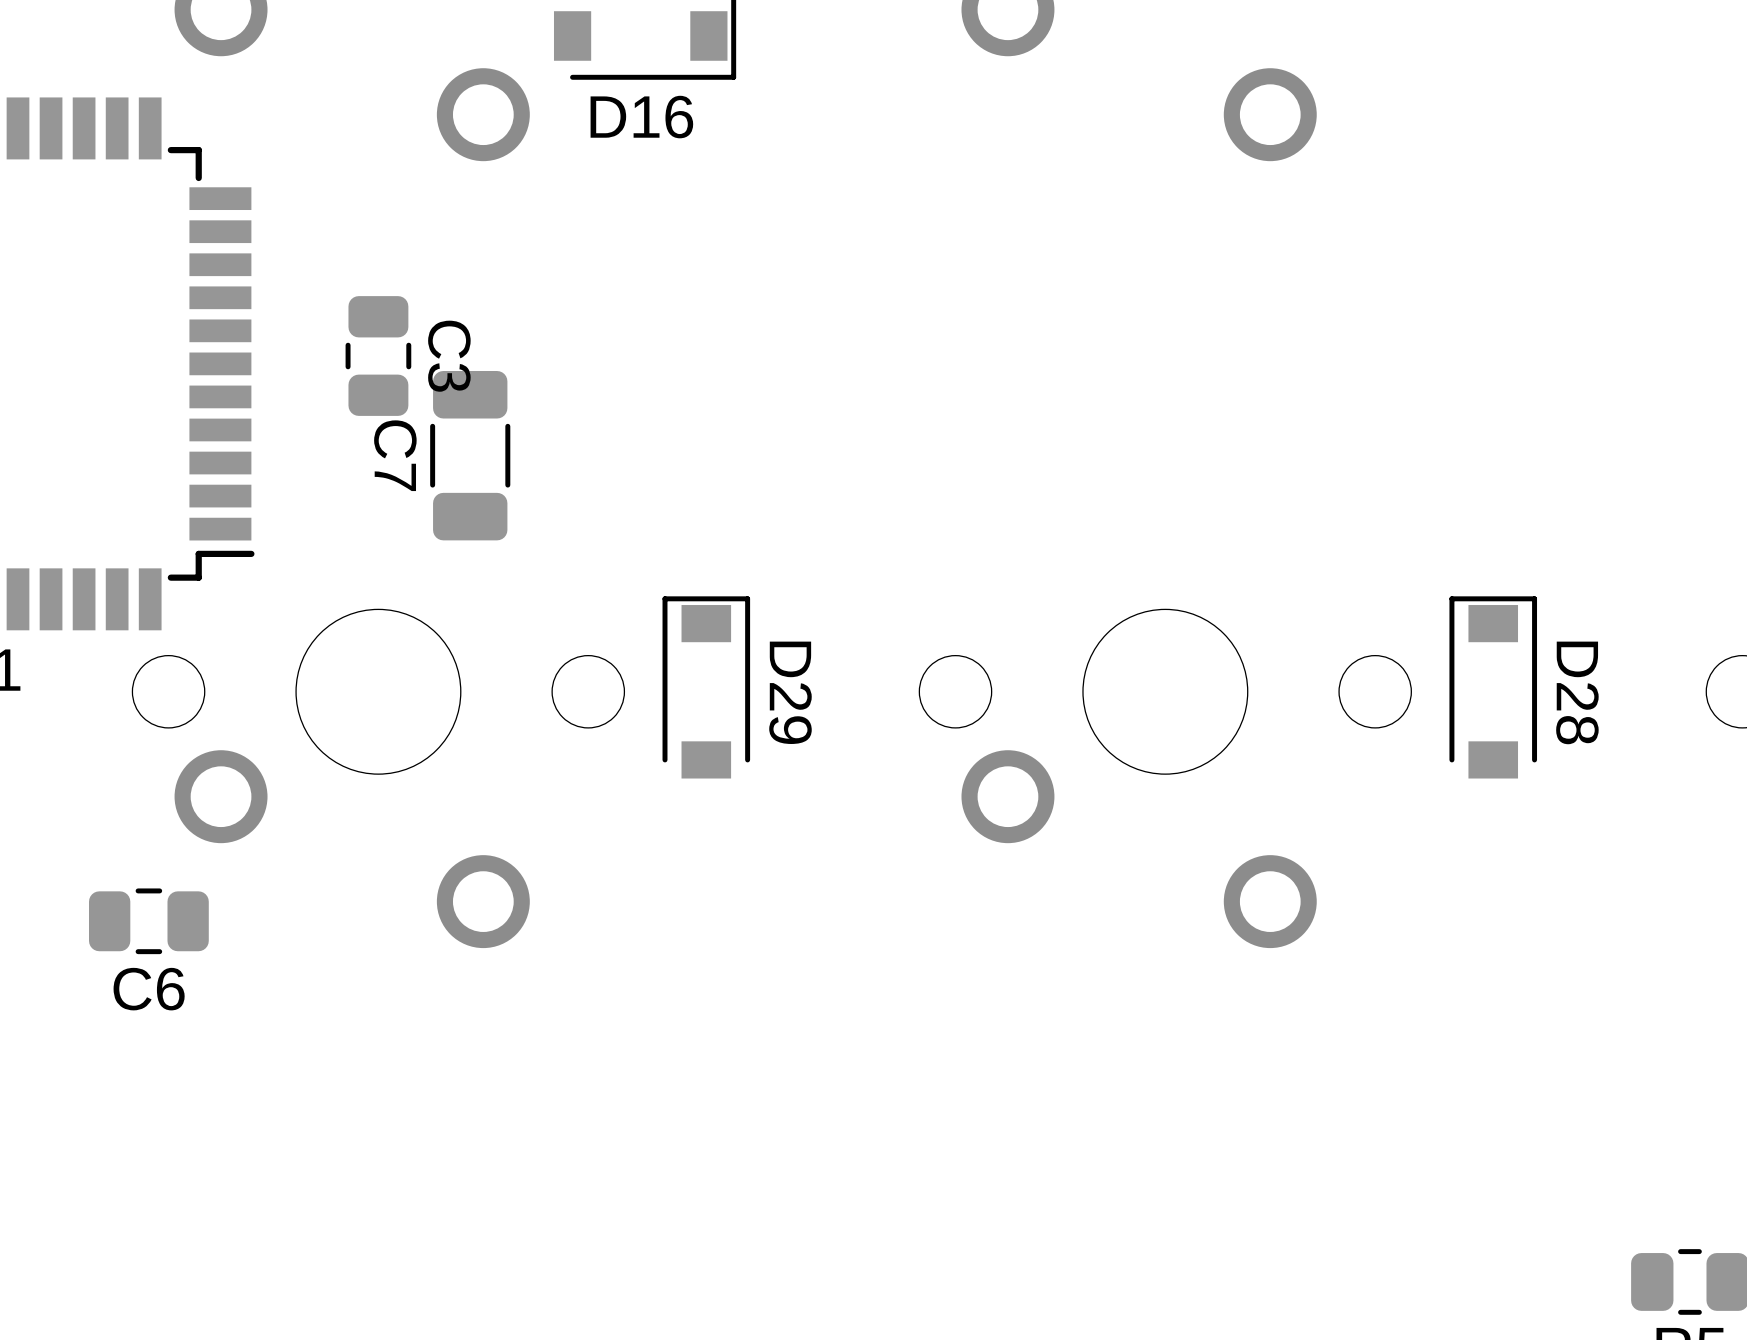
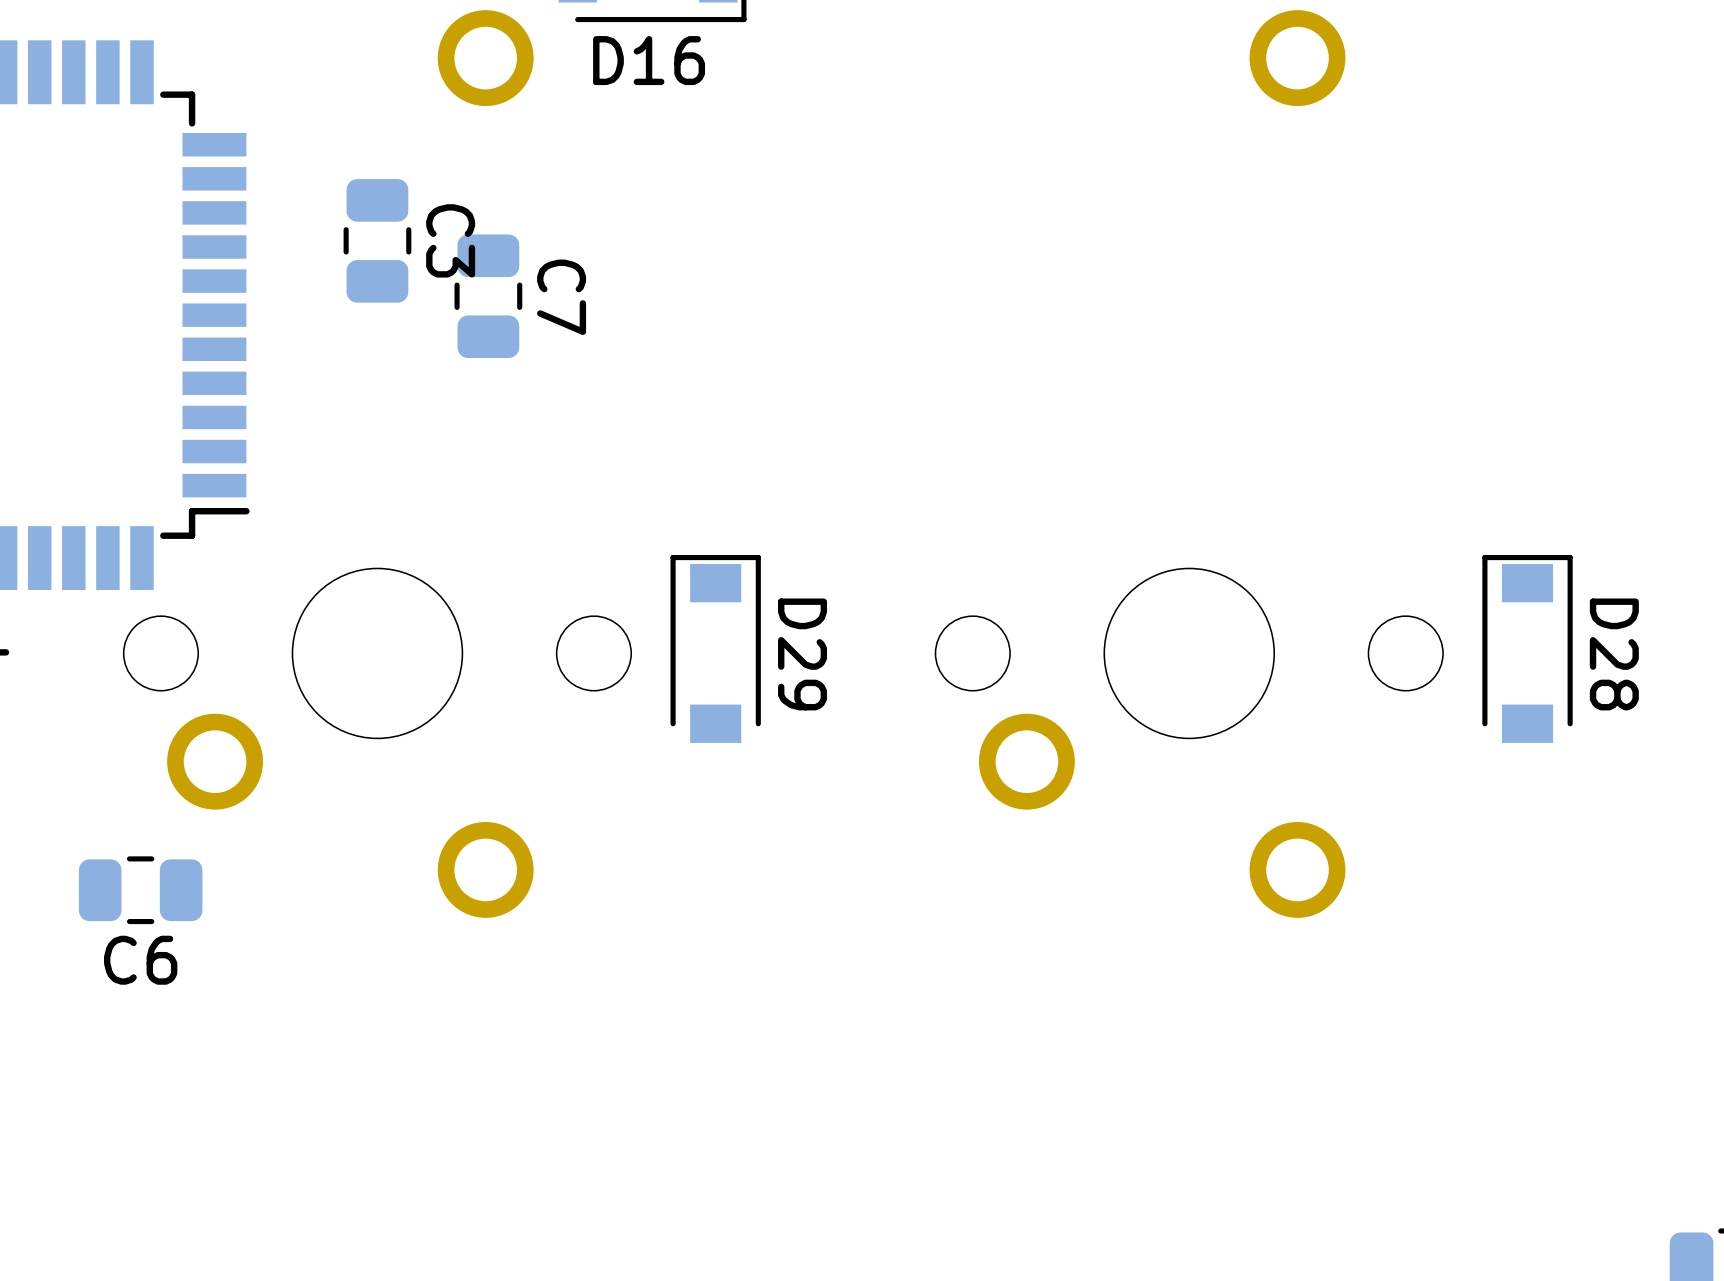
C3 position: (378, 356) -> (377, 240)
C7 footprint: [430, 371, 511, 541] -> [454, 234, 523, 359]
C7 name position: C7 (395, 455) -> C7 (561, 297)

